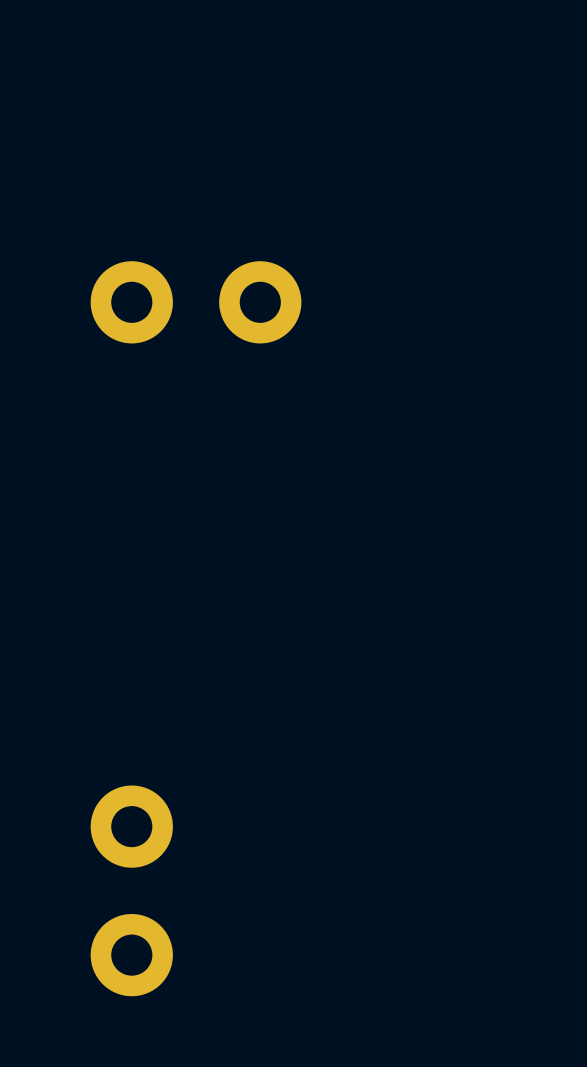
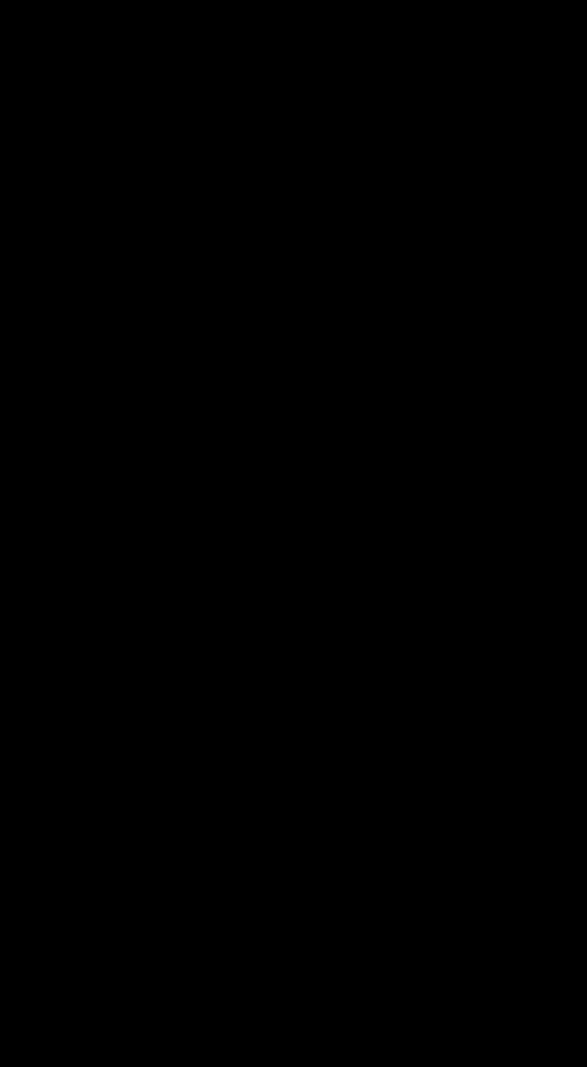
part: (196, 302) -> none
part: (131, 890) -> none

